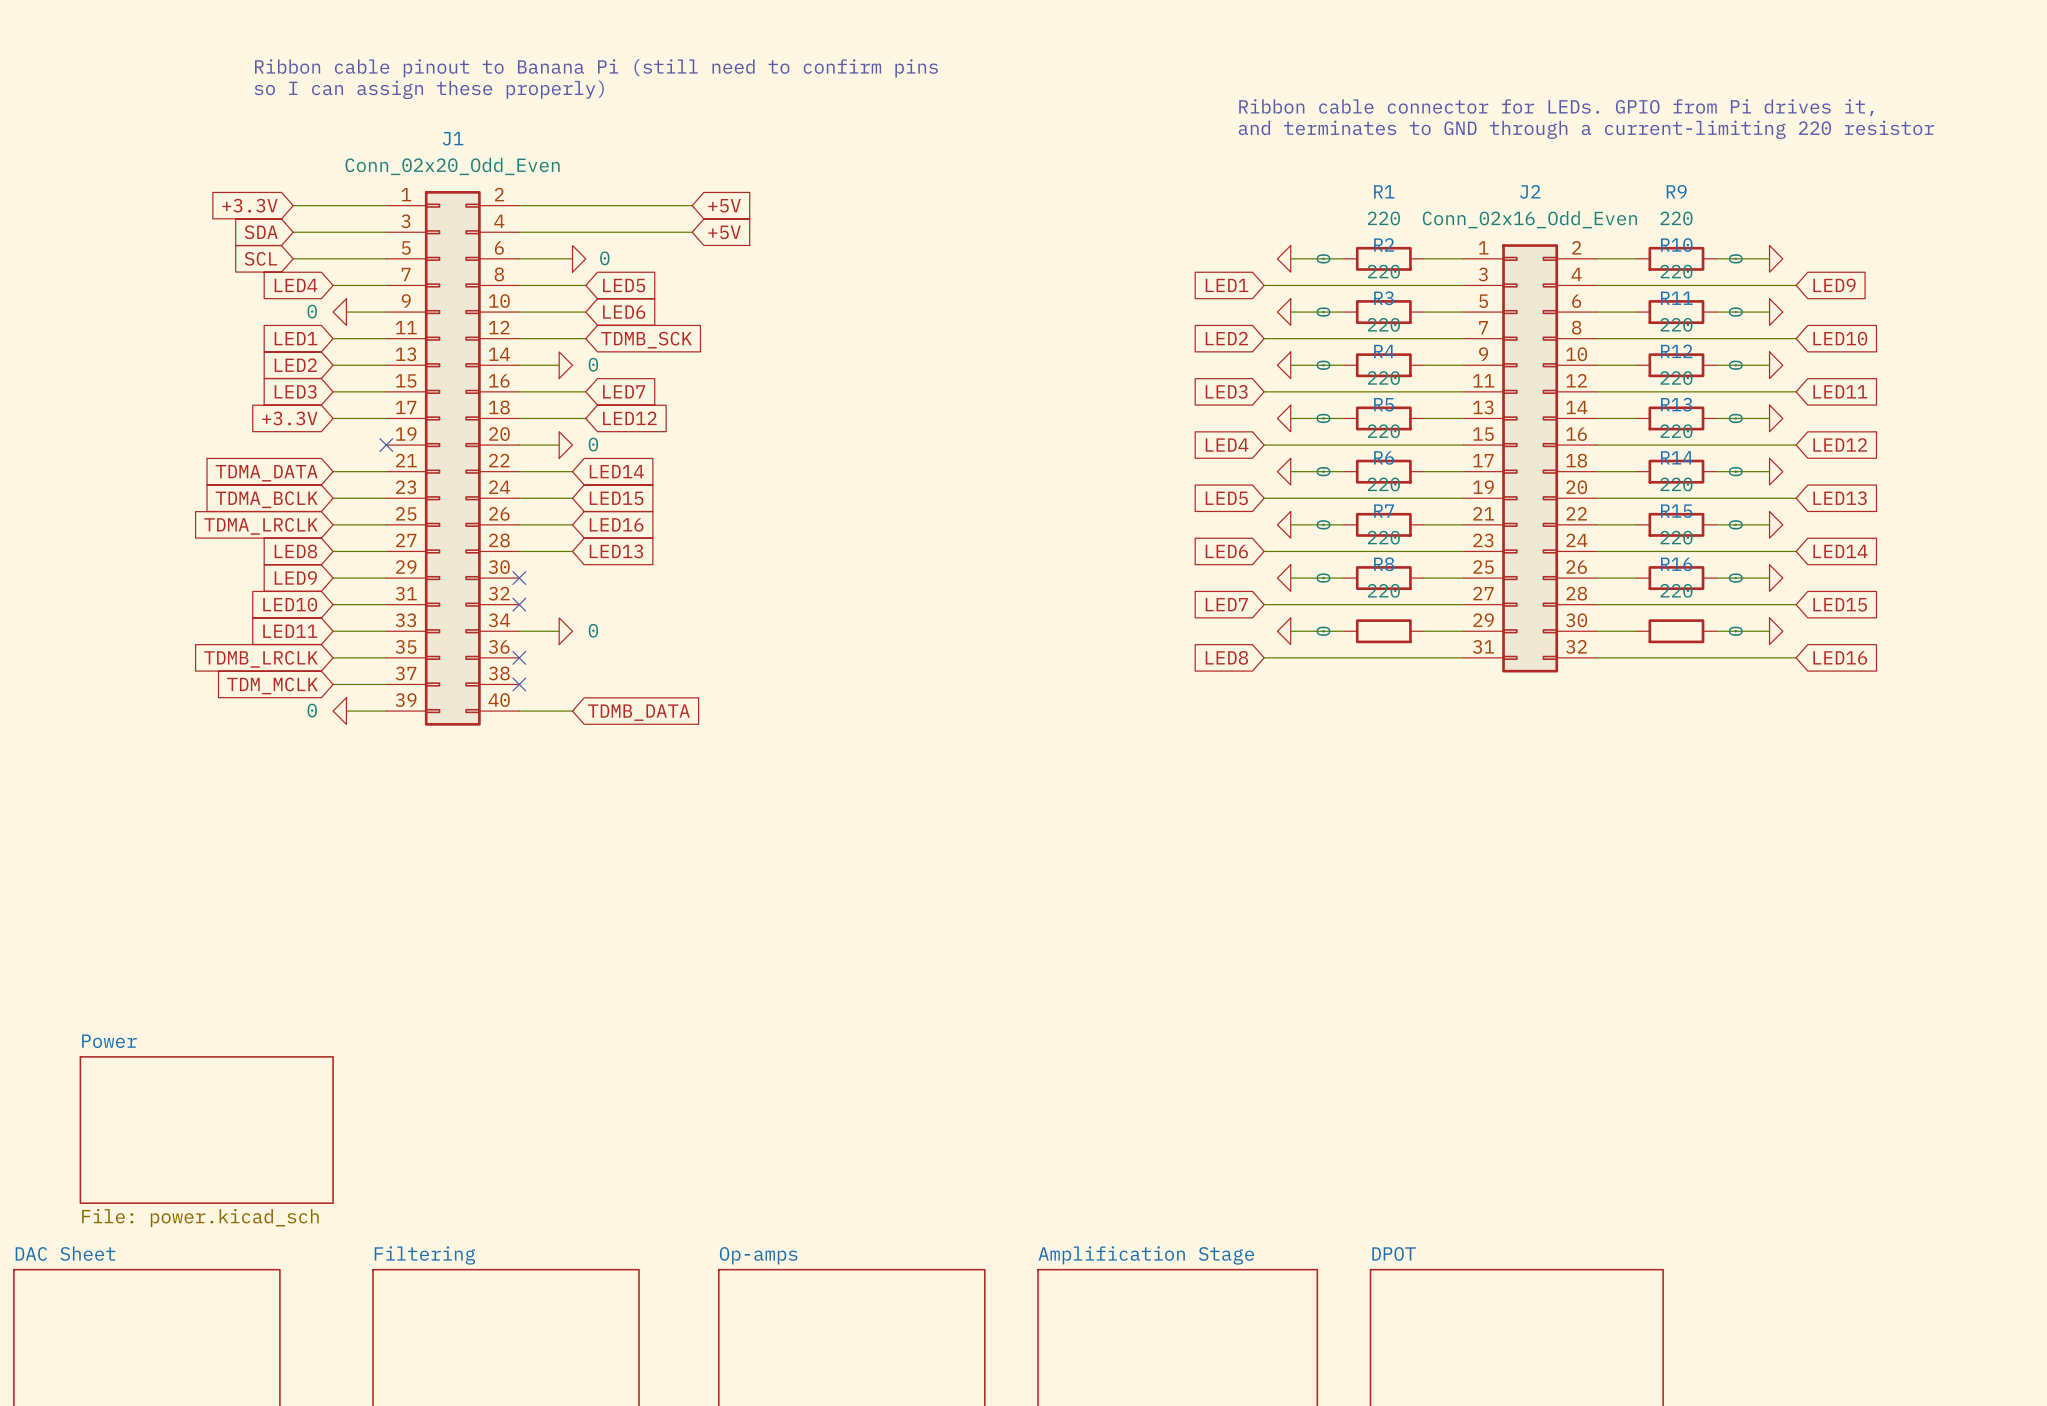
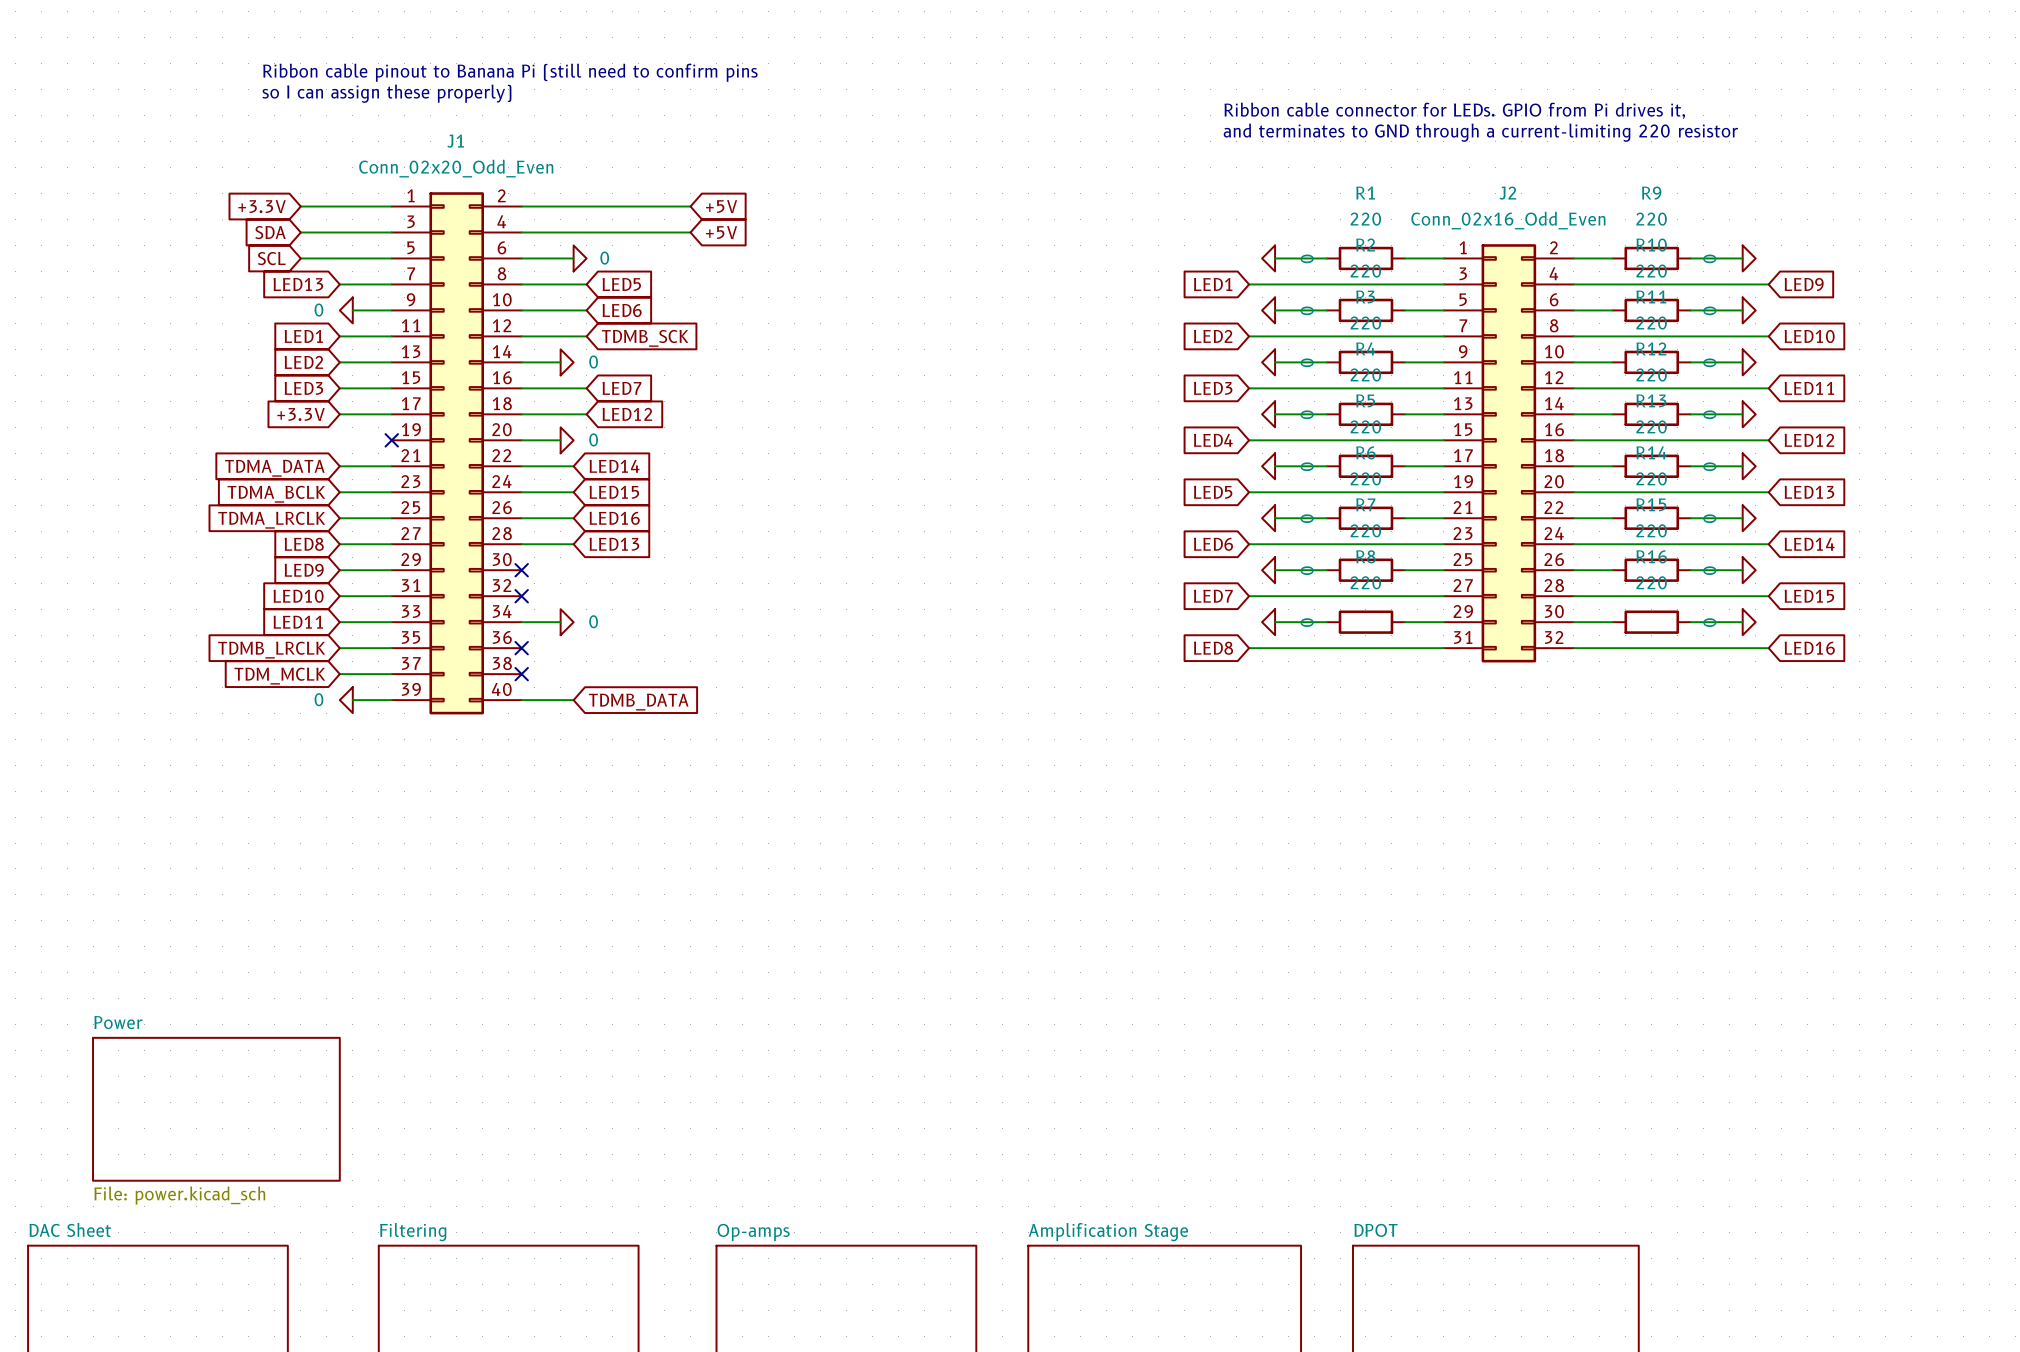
global label: LED4 (296, 285) -> LED13 (298, 284)

